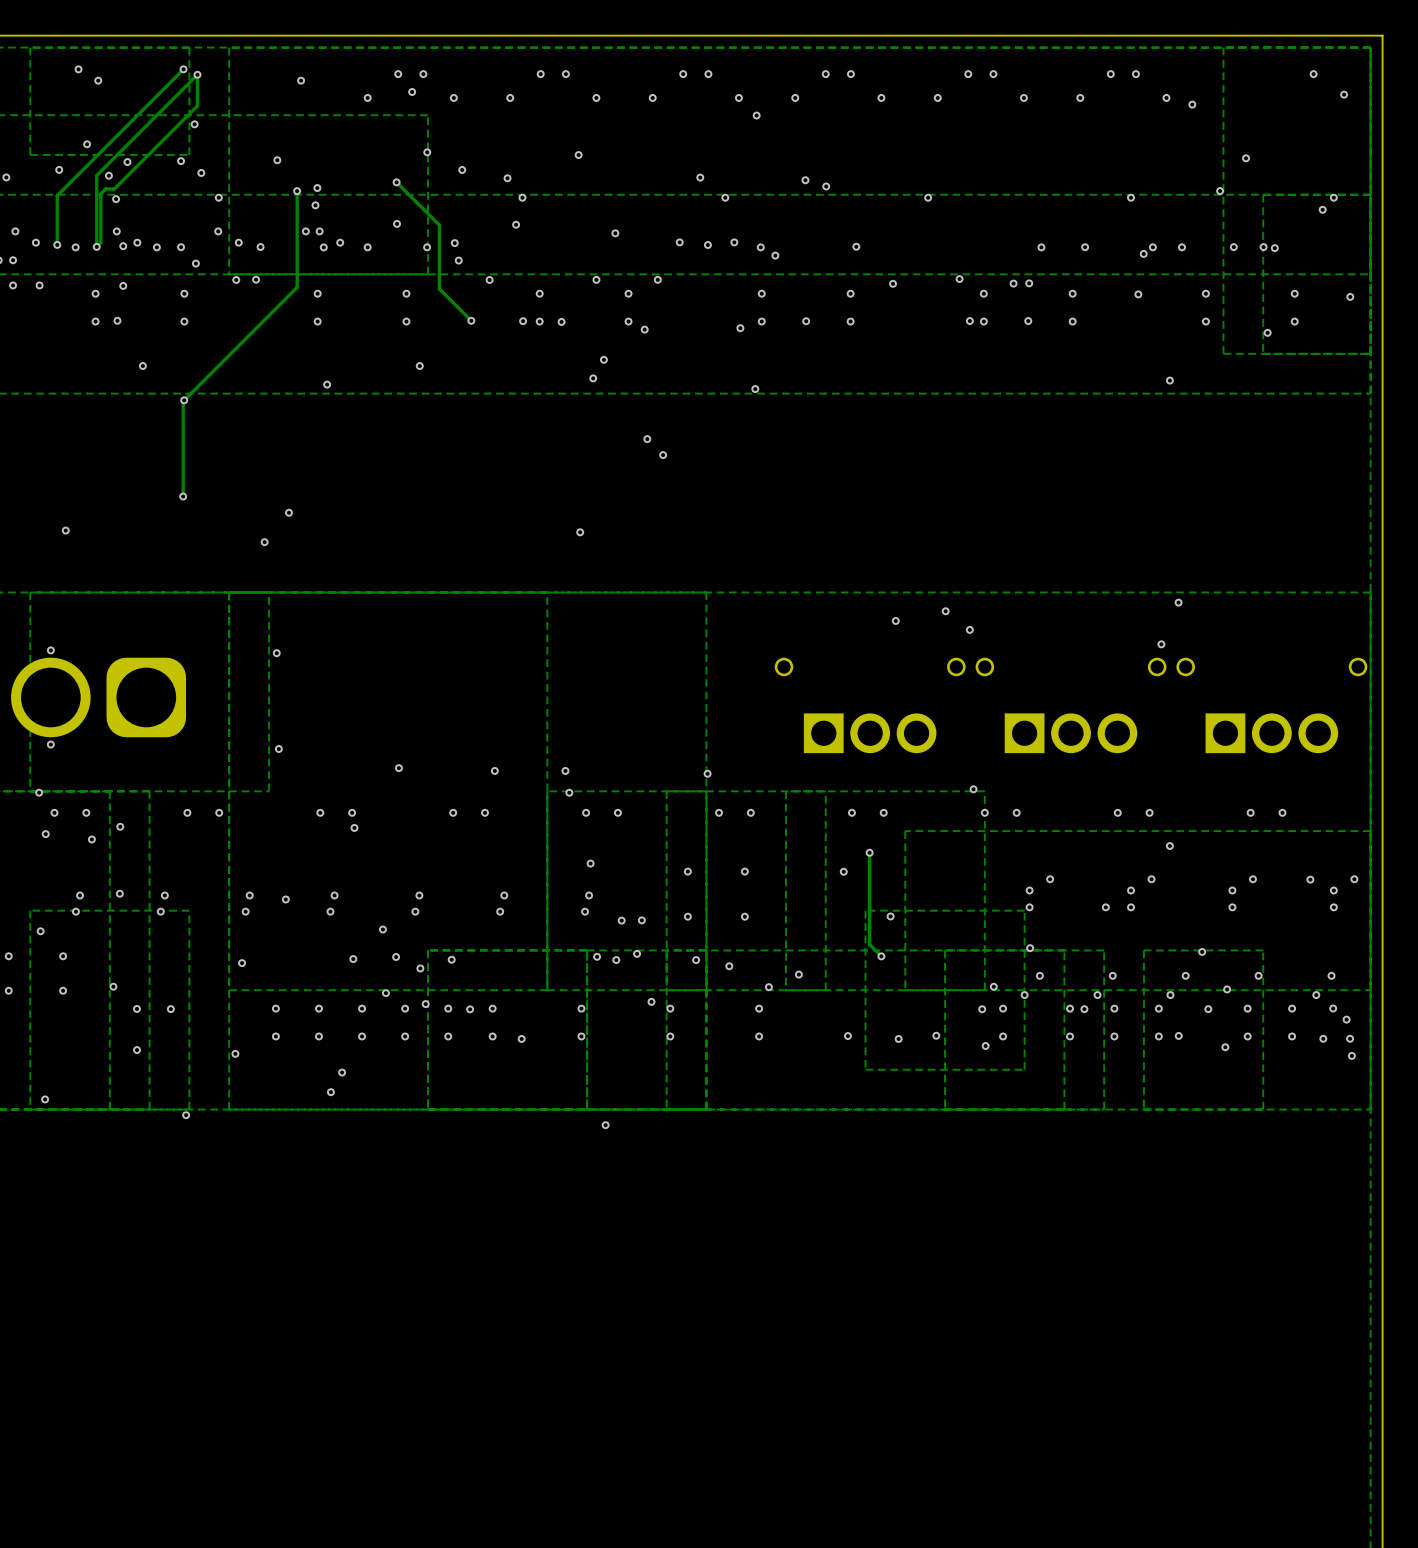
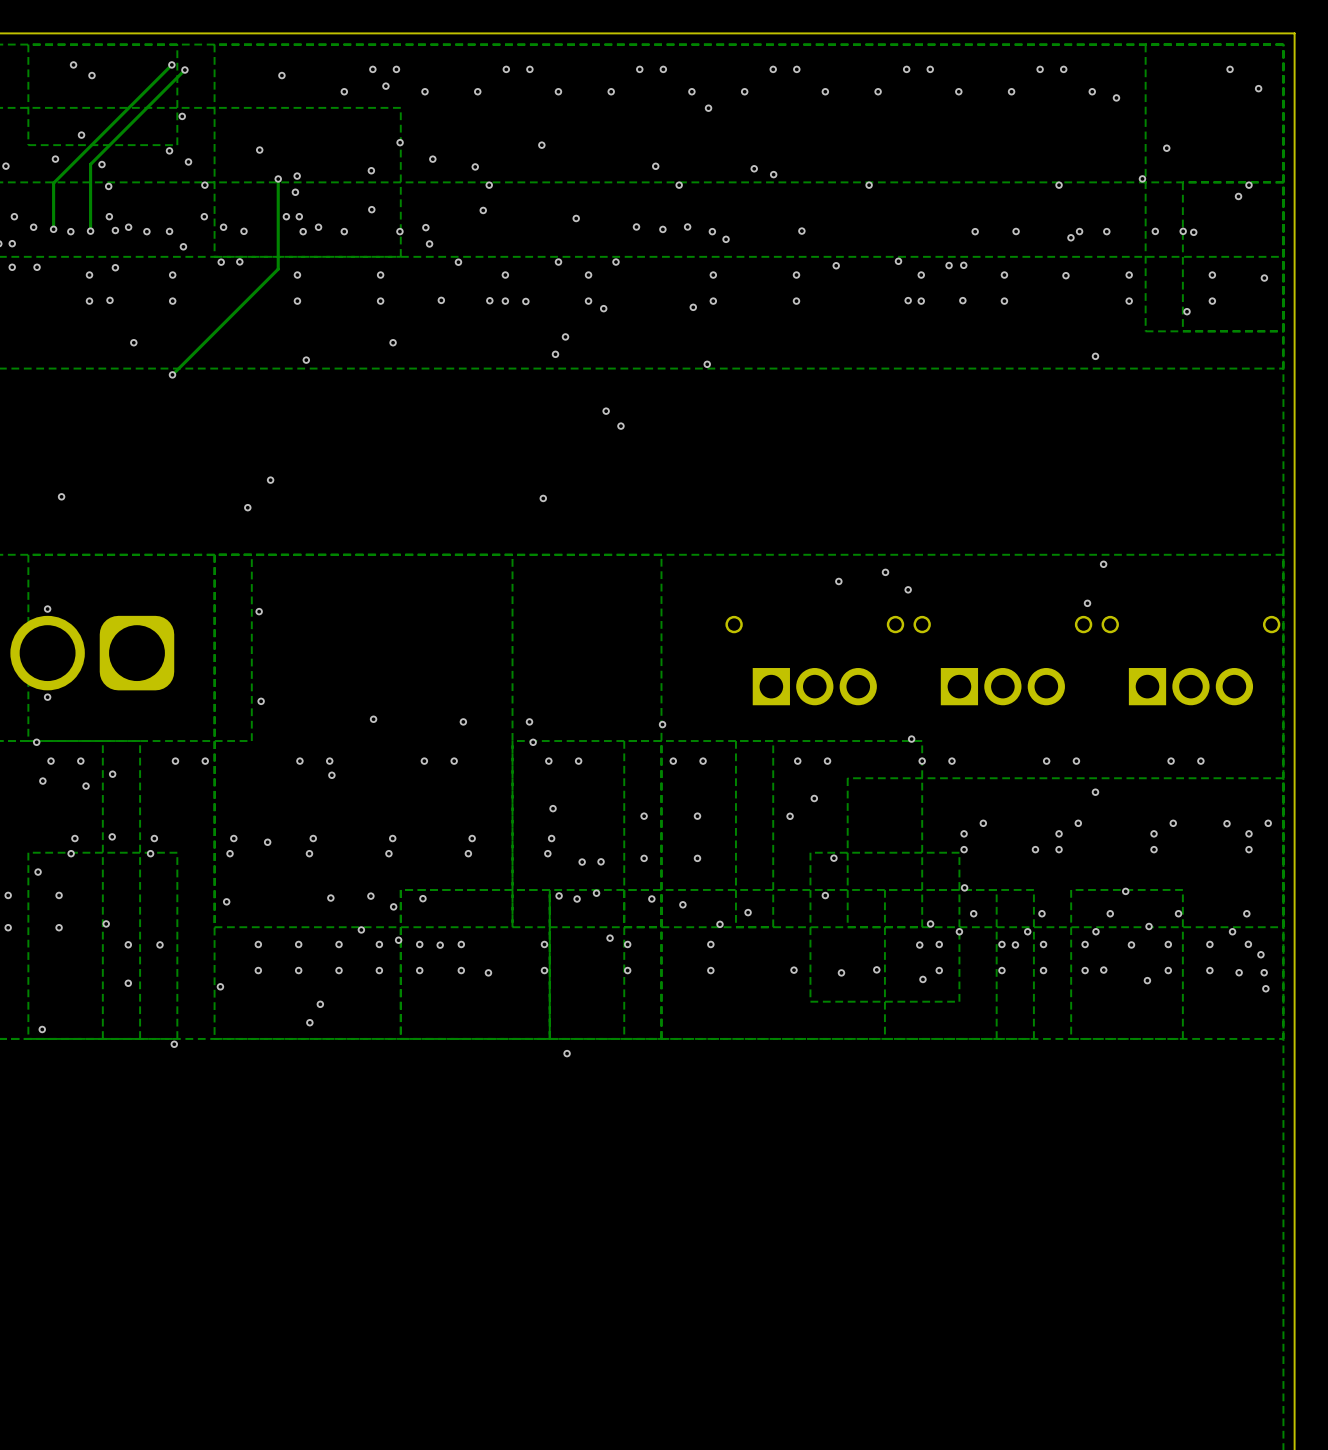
track: (197, 74) (197, 105) (114, 188) (105, 188) (100, 193) (100, 242) (96, 246) -> none
via: (127, 162) -> none
track: (396, 182) (439, 225) (439, 288) (471, 320) -> none
via: (806, 321) -> none
track: (184, 400) (183, 496) -> none
via: (183, 496) -> none
track: (869, 852) (869, 944) (881, 956) -> none
via: (382, 929) -> none

